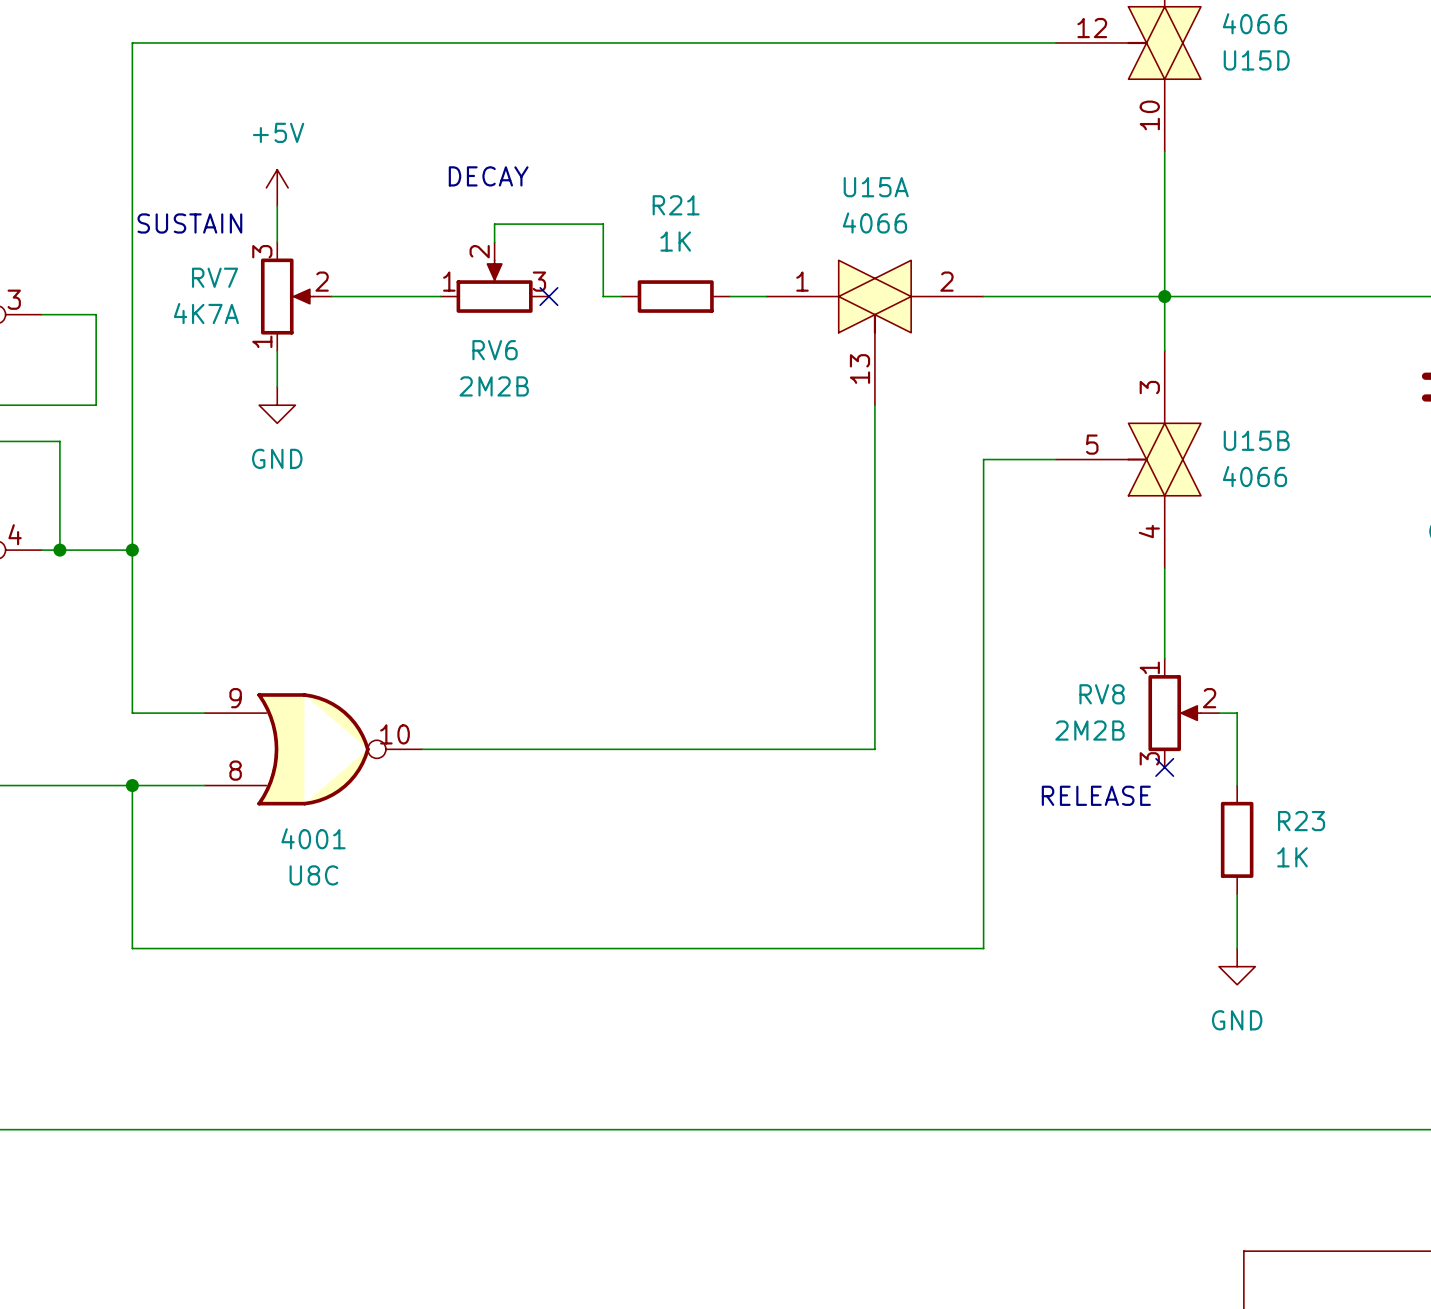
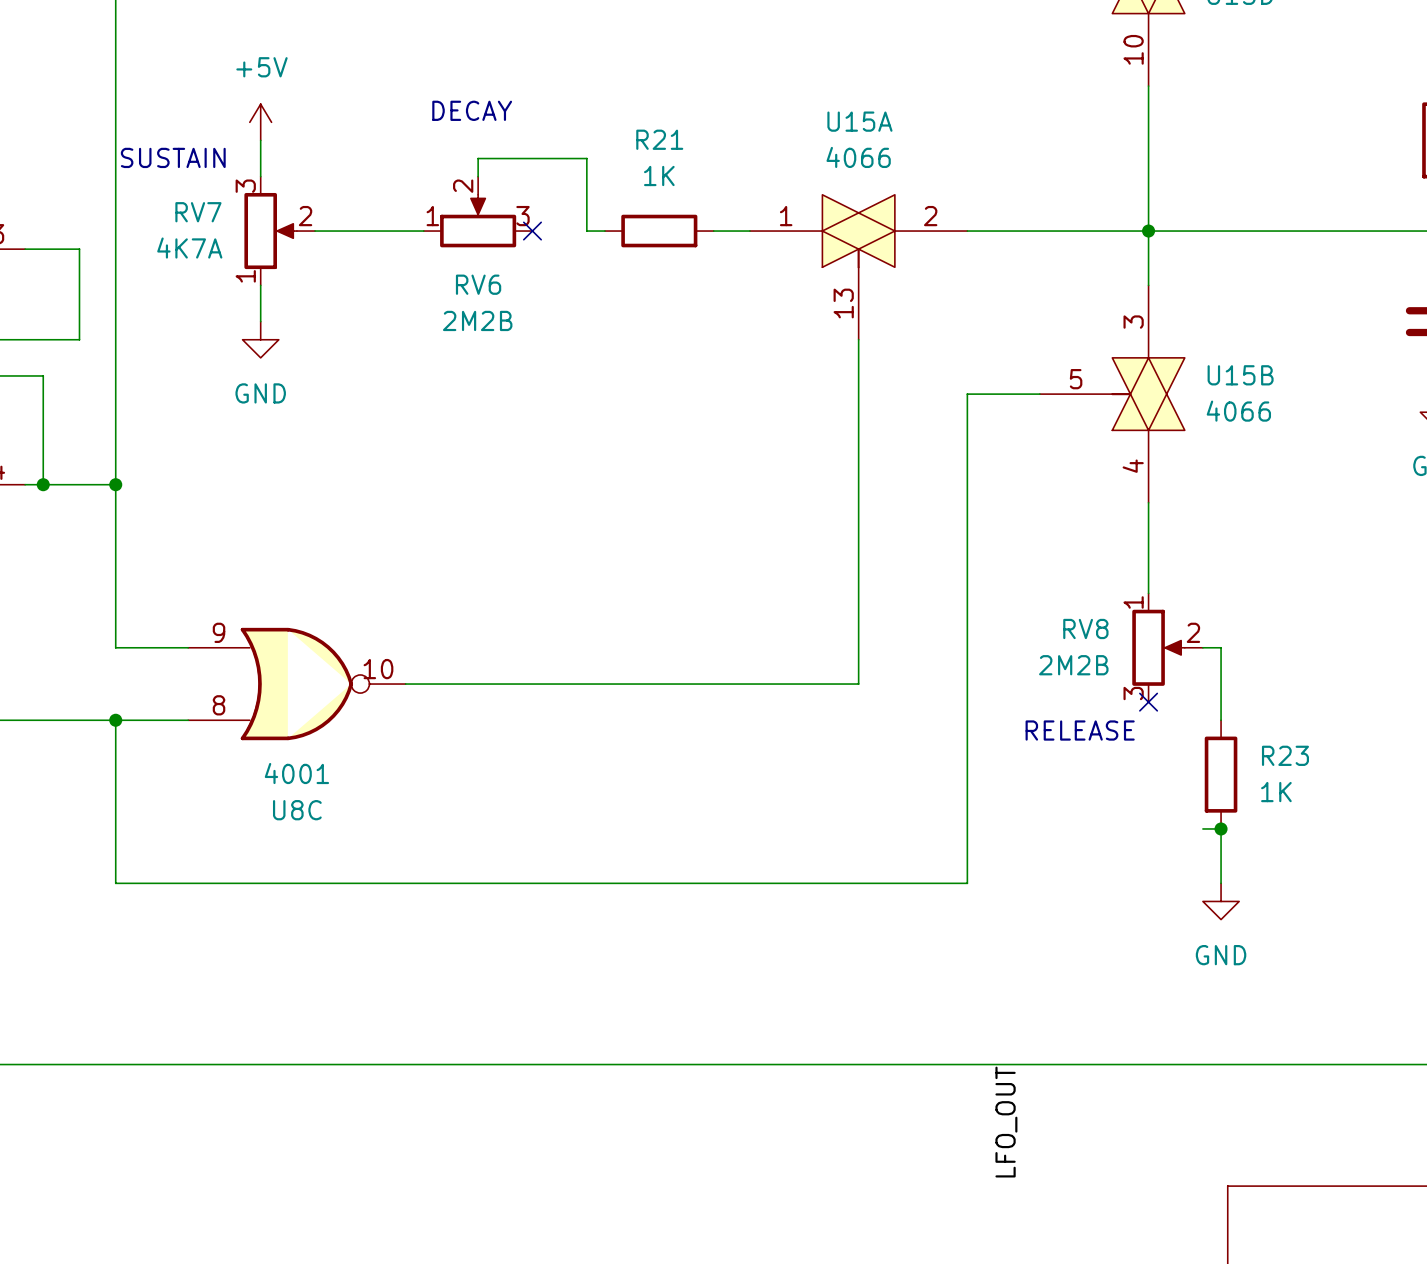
wire: none -> (1202, 828) (1221, 828)
junction: none -> (1221, 828)
label: none -> LFO_OUT (1006, 1122)

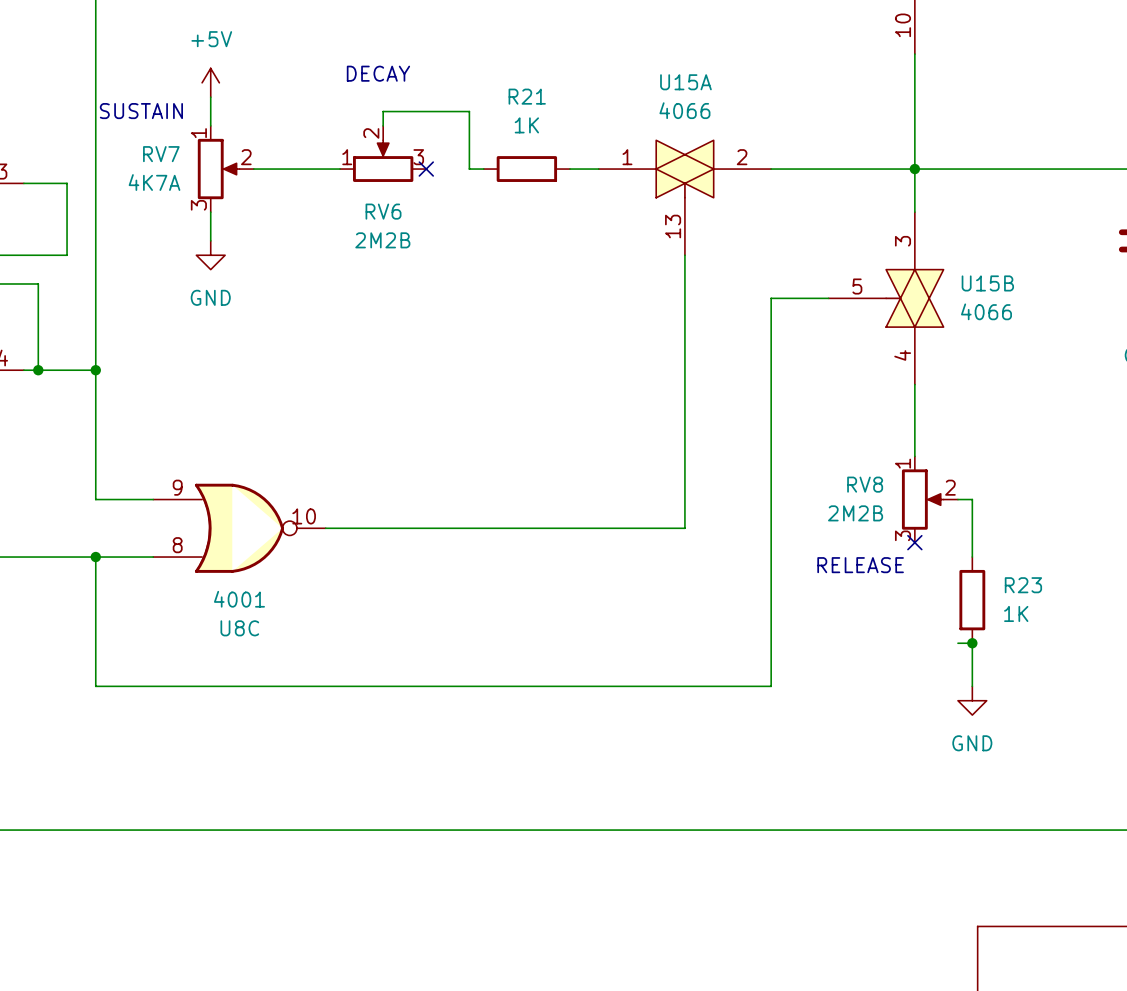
RV7 flip: as is (270, 231) -> up-down (218, 169)
label: LFO_OUT (1006, 1122) -> none

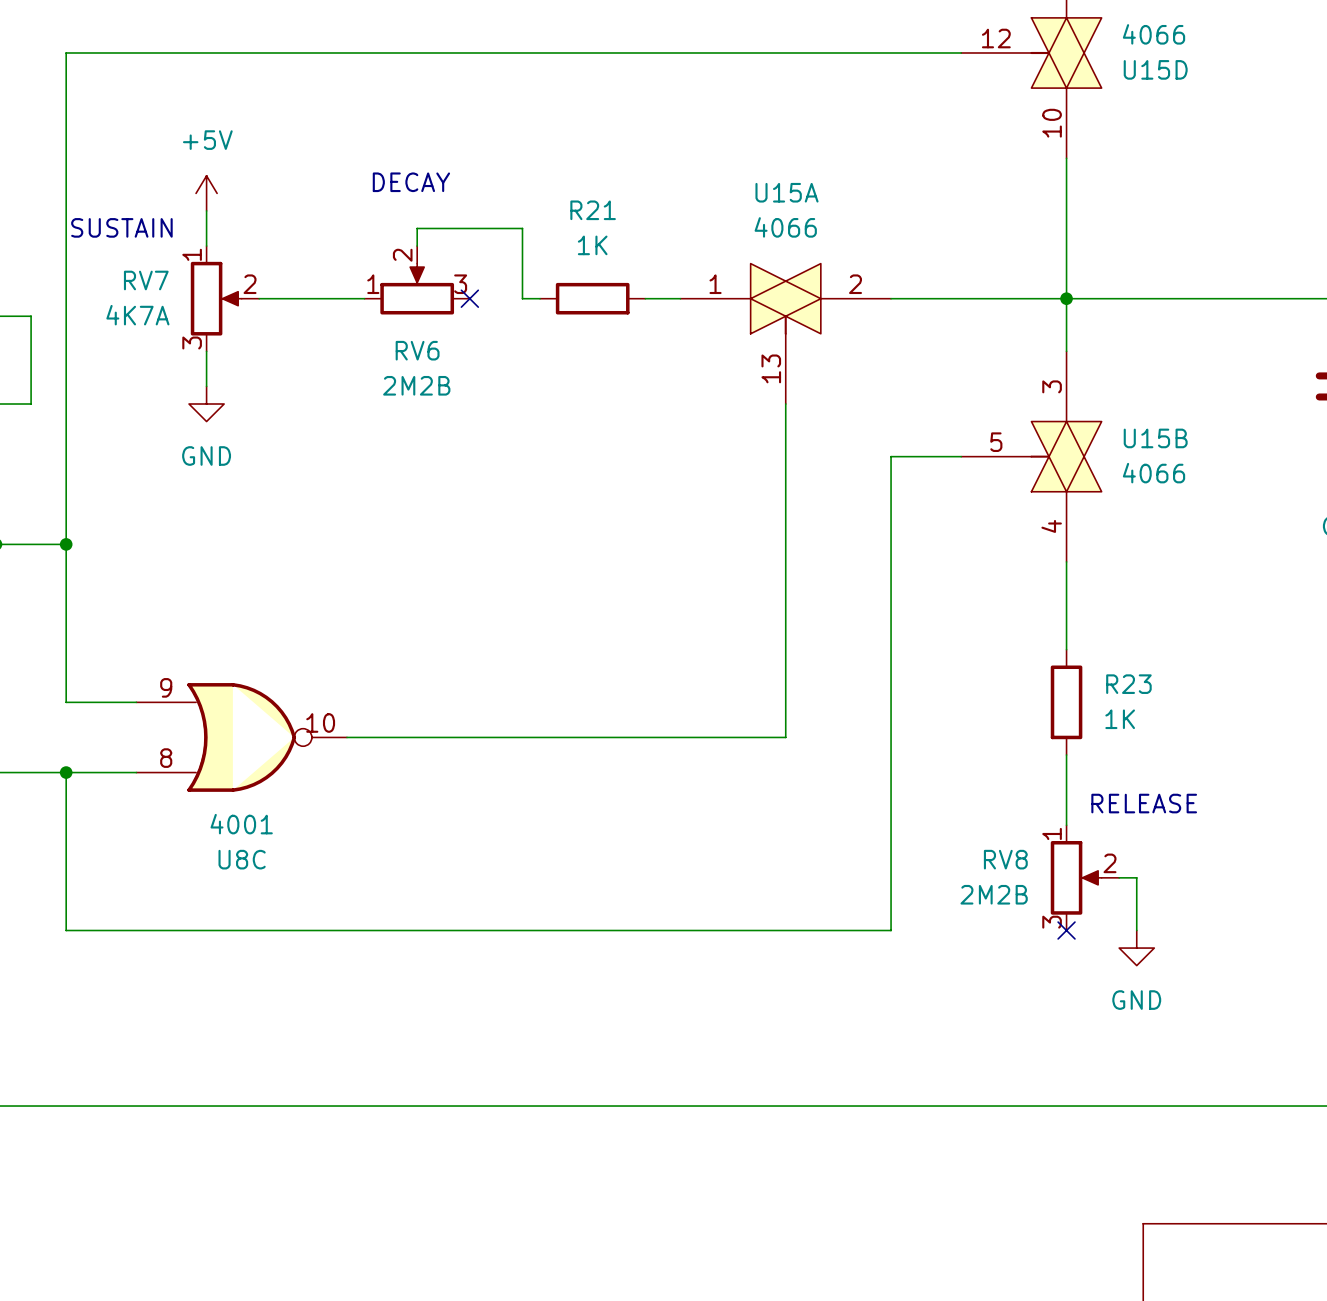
RV8 position: (929, 499) -> (1084, 877)
wire: (957, 499) (972, 499) (972, 557) -> none
wire: none -> (1066, 755) (1066, 825)
no-connect mark: (914, 542) -> none
text position: RELEASE (860, 565) -> RELEASE (1144, 803)
R23 position: (972, 600) -> (1066, 702)
junction: (972, 643) -> none
no-connect mark: none -> (1066, 930)

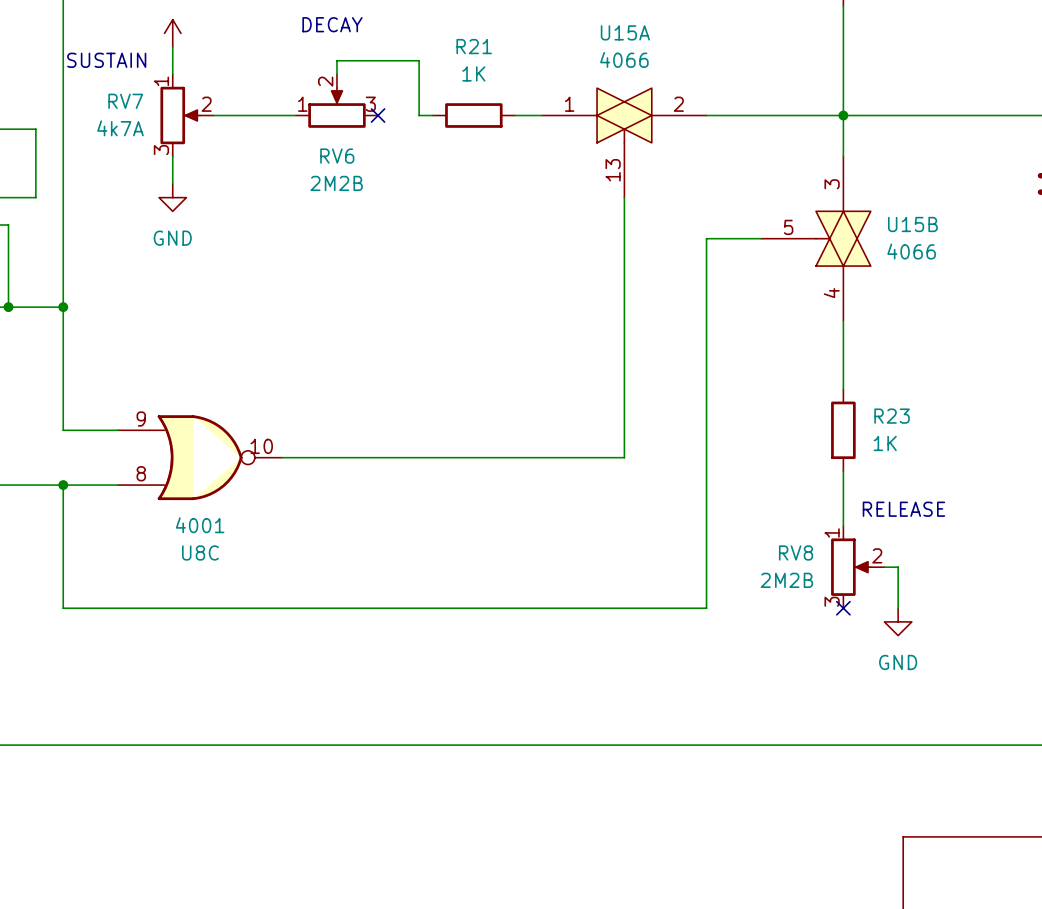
RV7 value: 4K7A (137, 315) -> 4k7A (120, 128)

